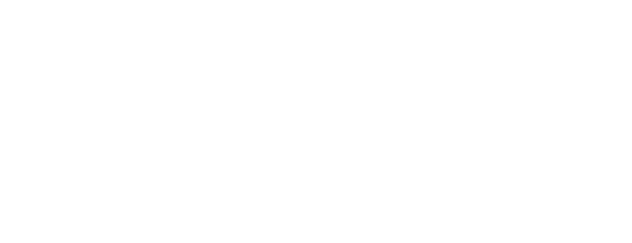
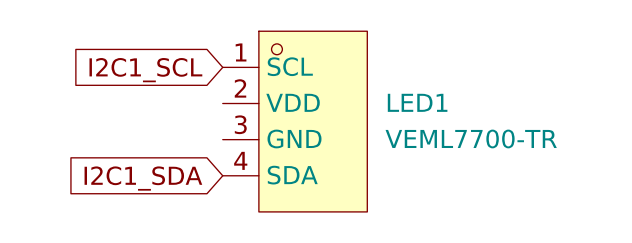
global label: none -> I2C1_SCL (145, 70)
LED1: none -> VEML7700-TR (295, 121)
global label: none -> I2C1_SDA (143, 178)

